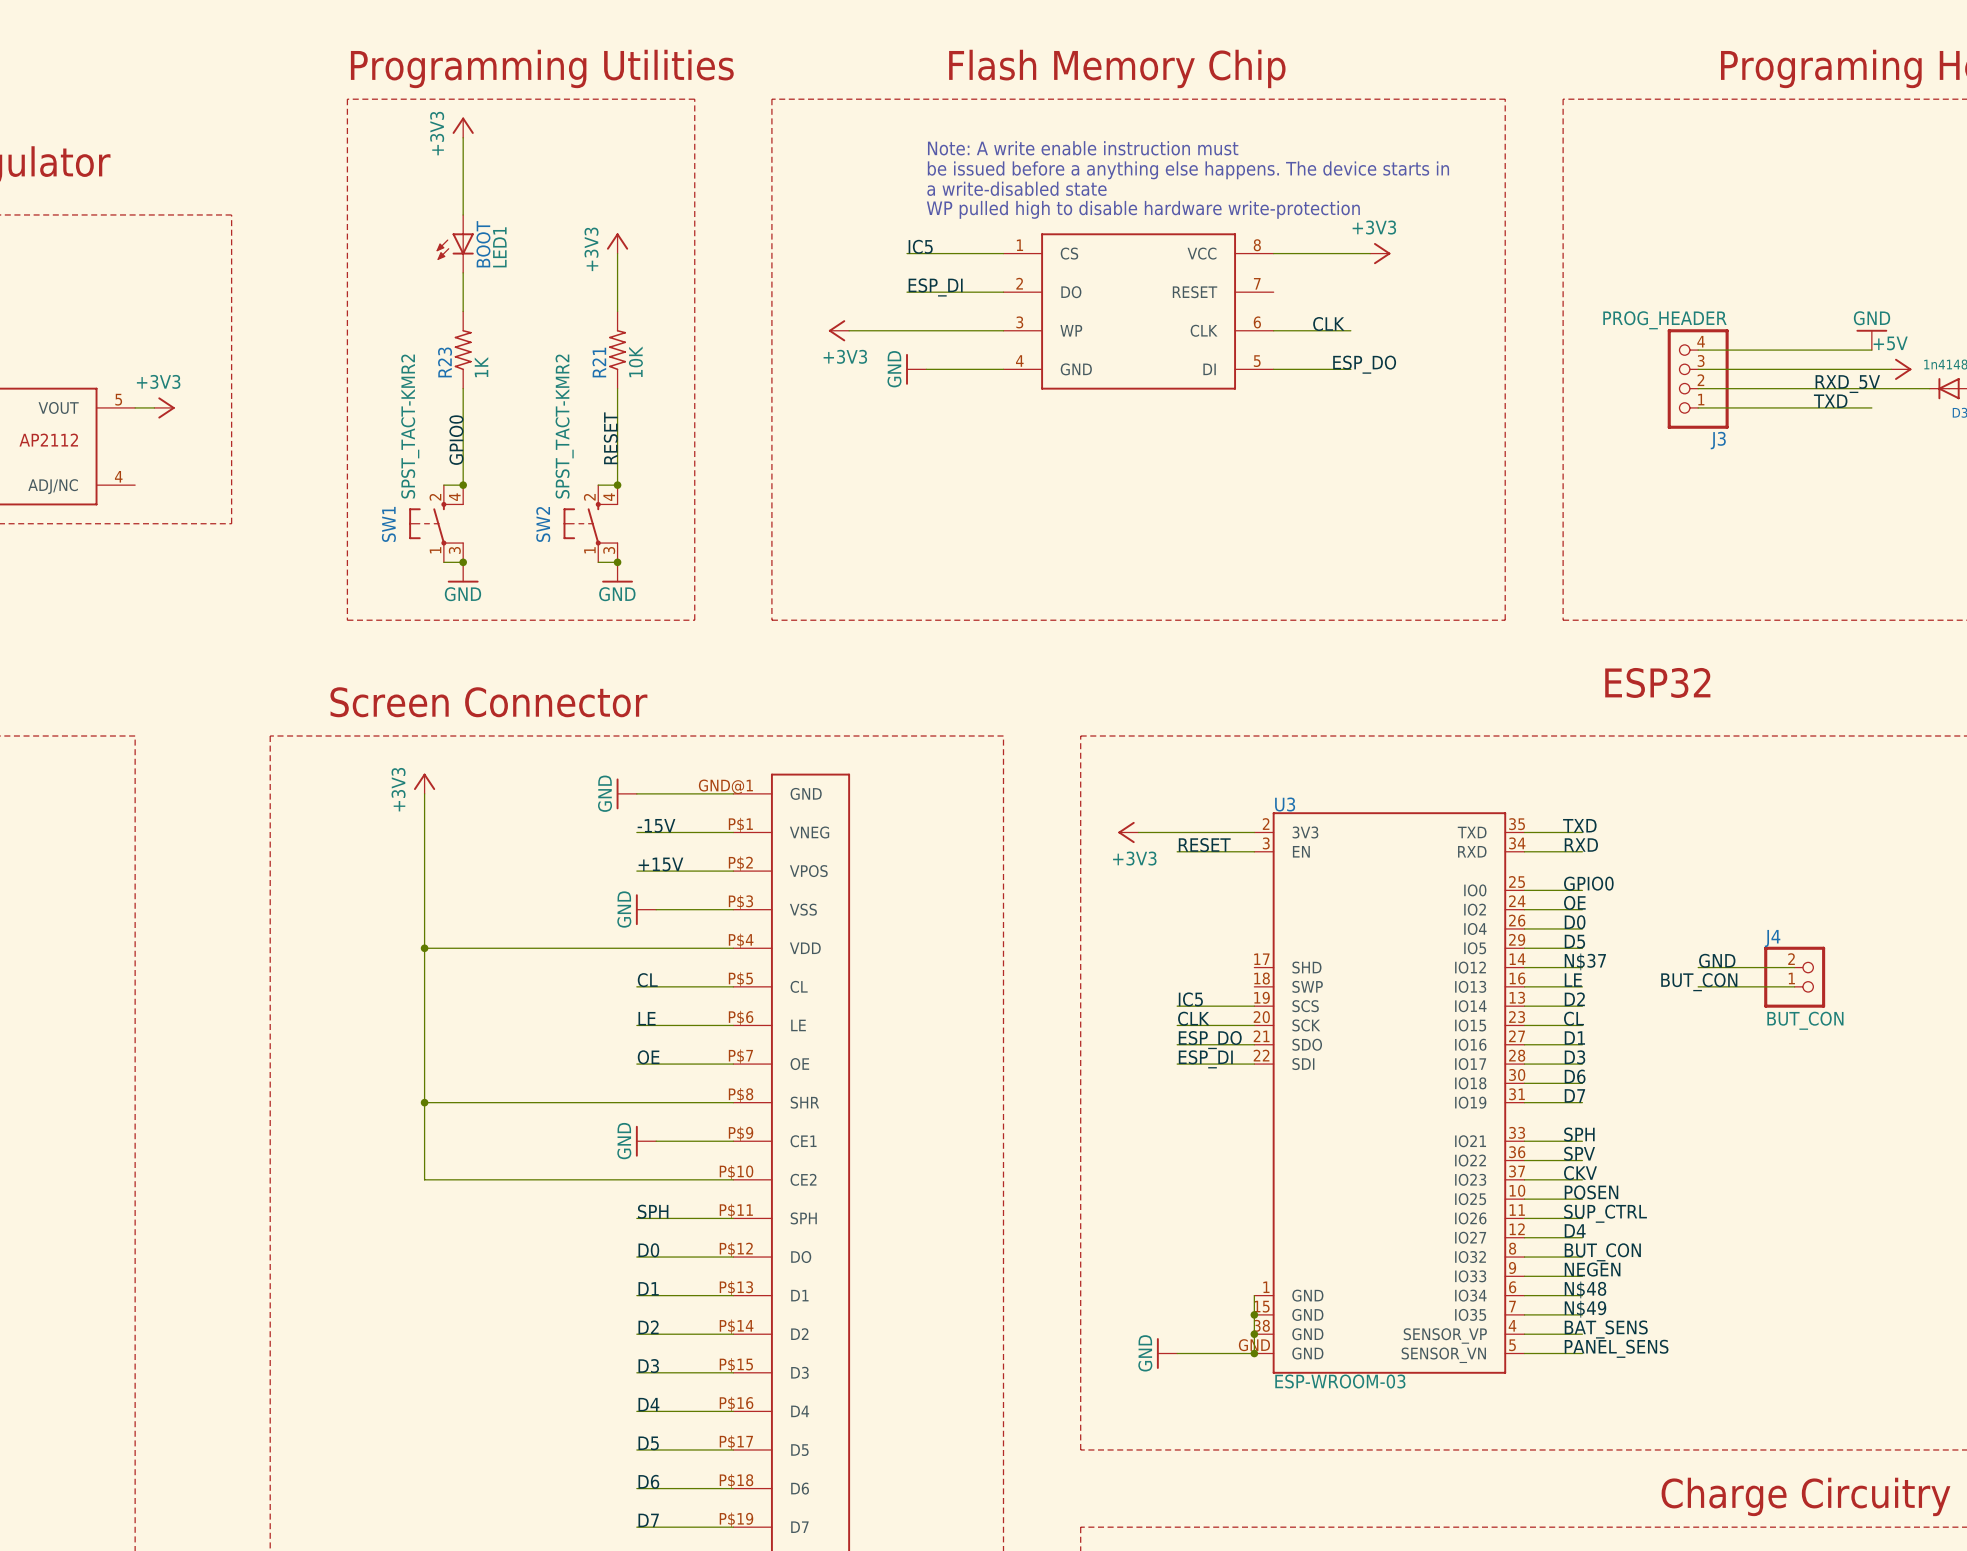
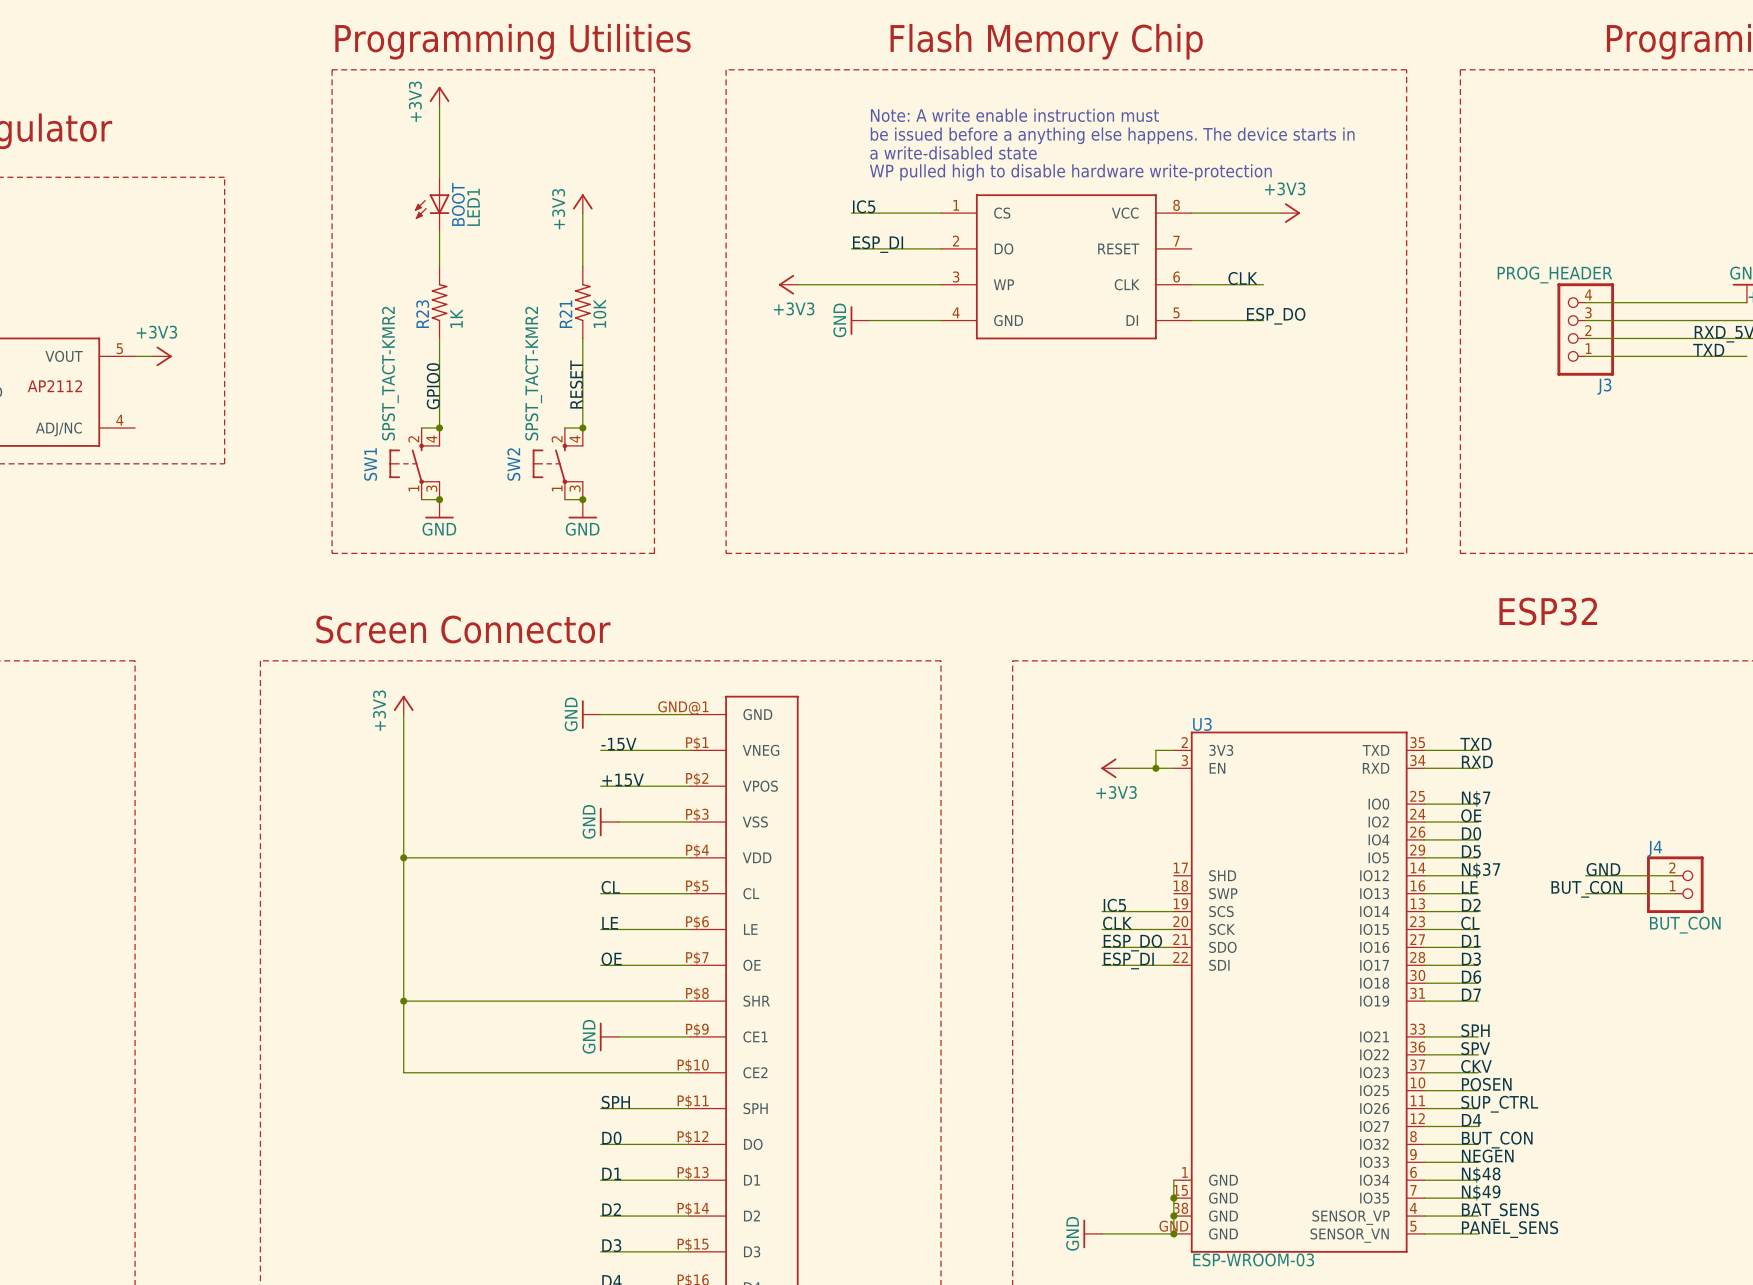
power symbol position: +3V3 (1128, 832) -> +3V3 (1110, 768)
wire: (1138, 832) (1235, 832) -> (1155, 768) (1155, 750)
label: RESET (1204, 845) -> none
junction: none -> (1155, 768)
label: GPIO0 (1588, 883) -> N$7 (1476, 798)

